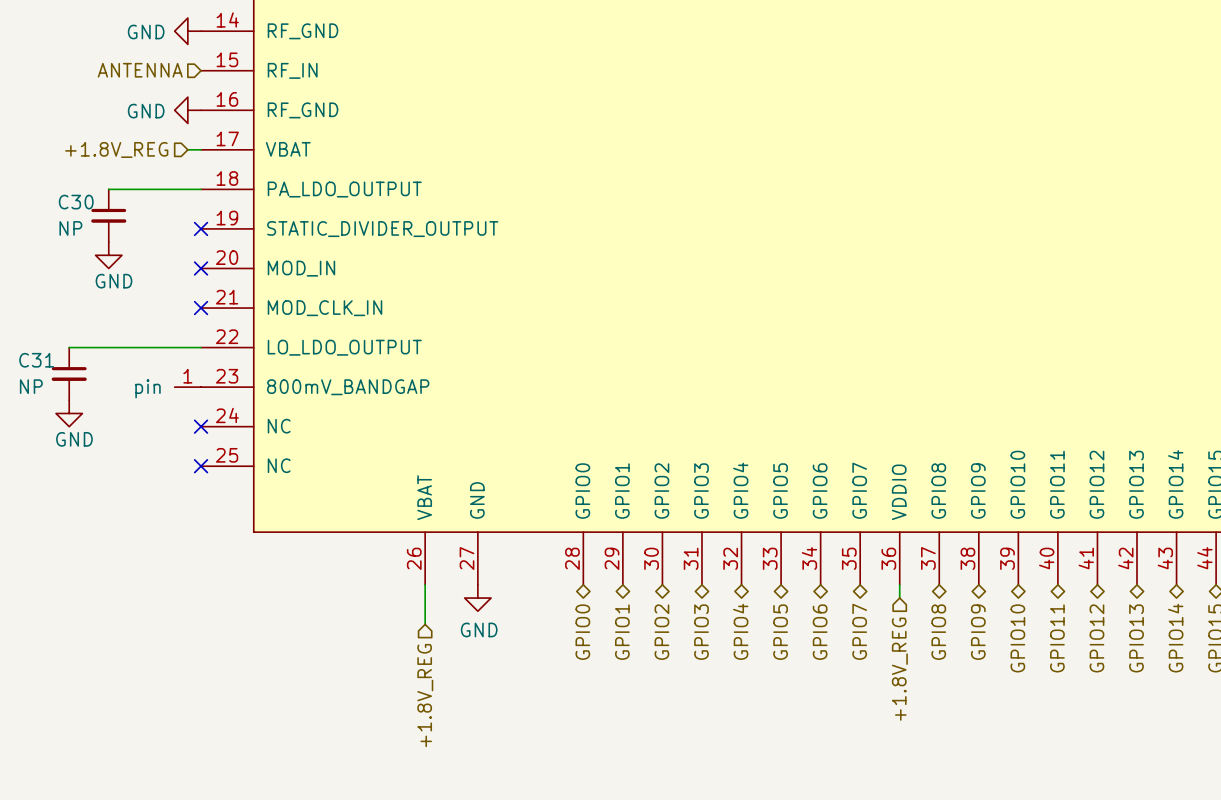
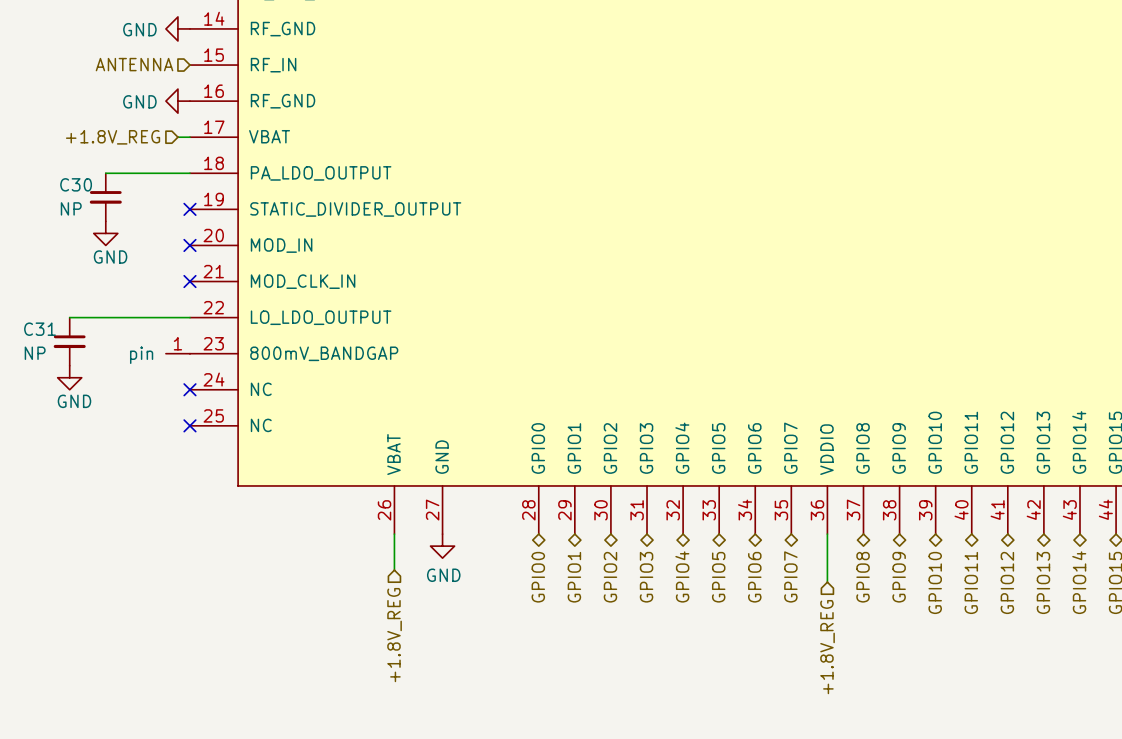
wire: none -> (827, 546) (827, 582)
hierarchical label position: +1.8V_REG (899, 669) -> +1.8V_REG (827, 647)

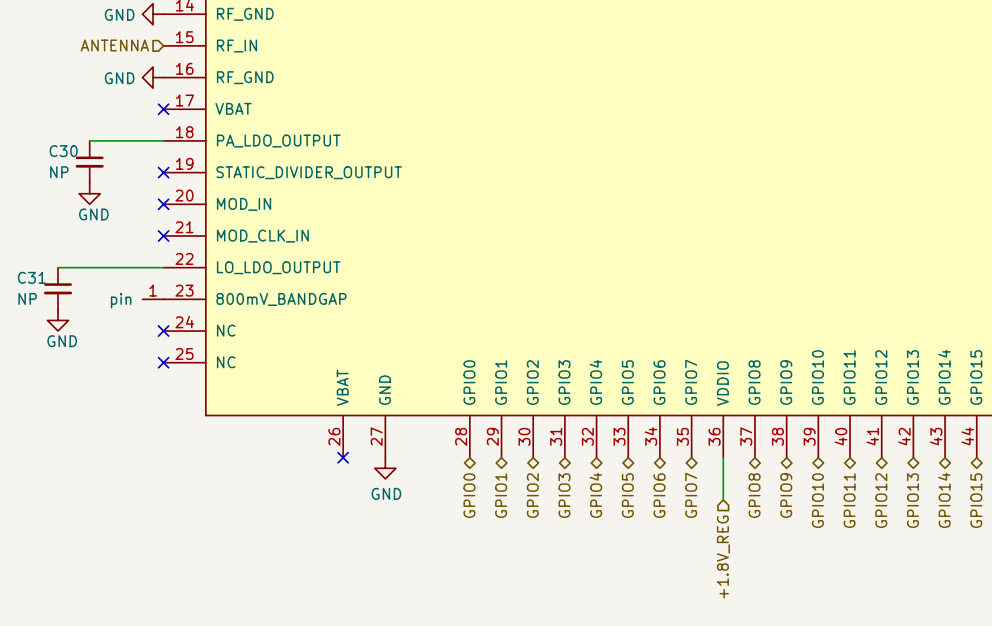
hierarchical label: +1.8V_REG (113, 137) -> none
wire: (177, 137) (189, 137) -> none
no-connect mark: none -> (163, 109)
wire: (394, 534) (394, 570) -> none
no-connect mark: none -> (343, 457)
hierarchical label: +1.8V_REG (394, 635) -> none

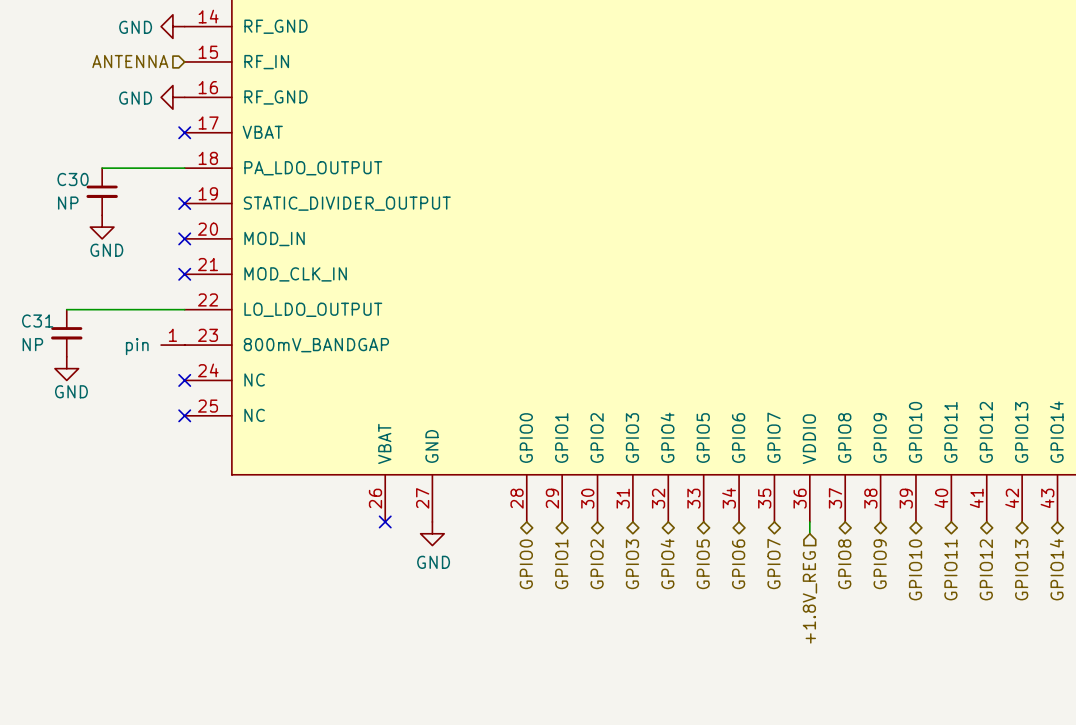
wire: (723, 468) (723, 499) -> none
hierarchical label position: +1.8V_REG (723, 556) -> +1.8V_REG (809, 597)

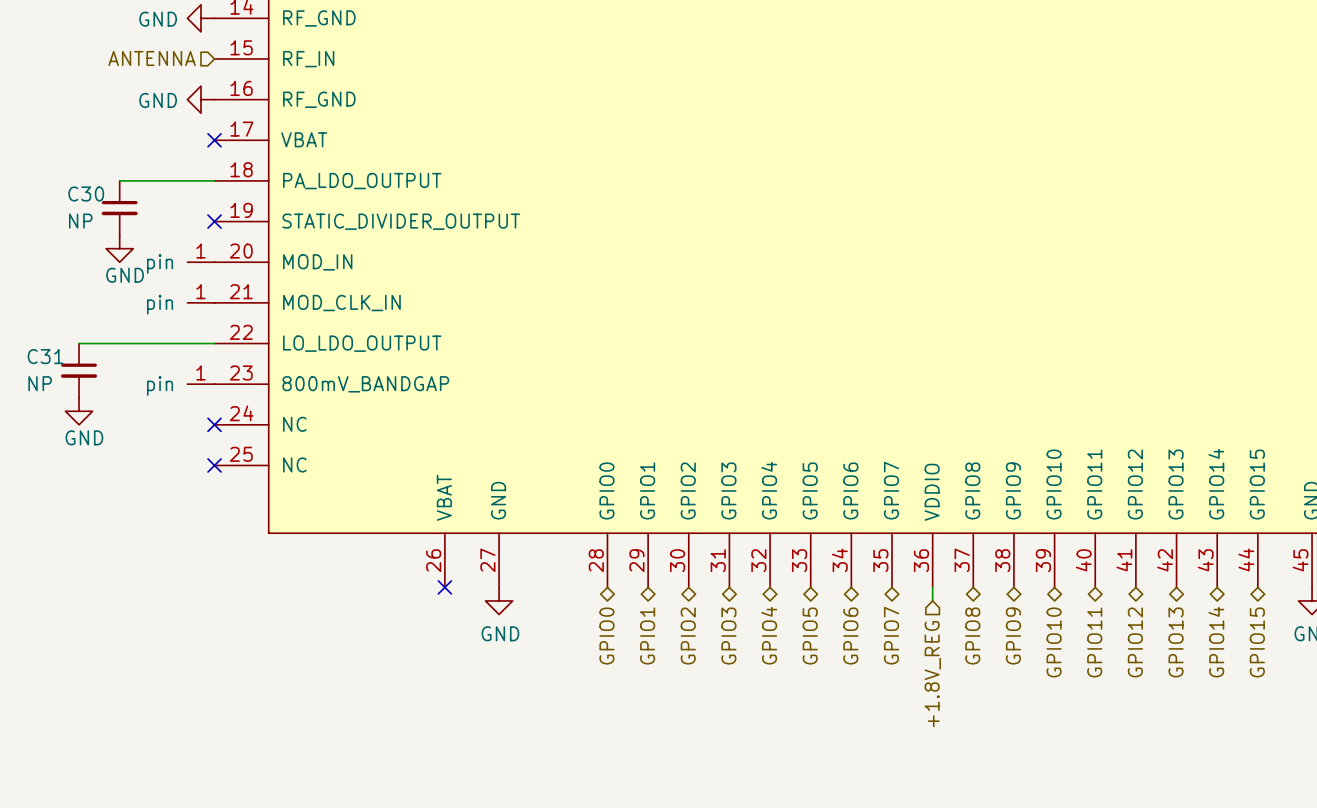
part: none -> (200, 262)
no-connect mark: (184, 238) -> none
part: none -> (200, 302)
no-connect mark: (184, 274) -> none

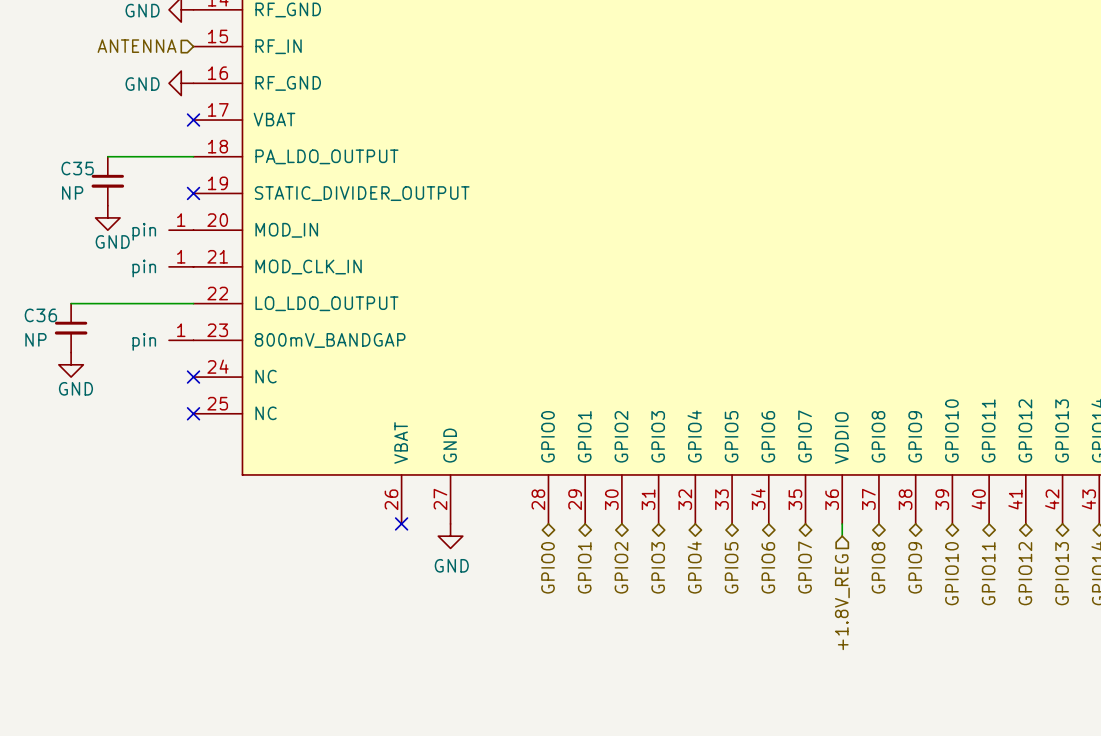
C30 name: C30 (86, 193) -> C35 (77, 168)
C31 name: C31 (45, 356) -> C36 (40, 315)

